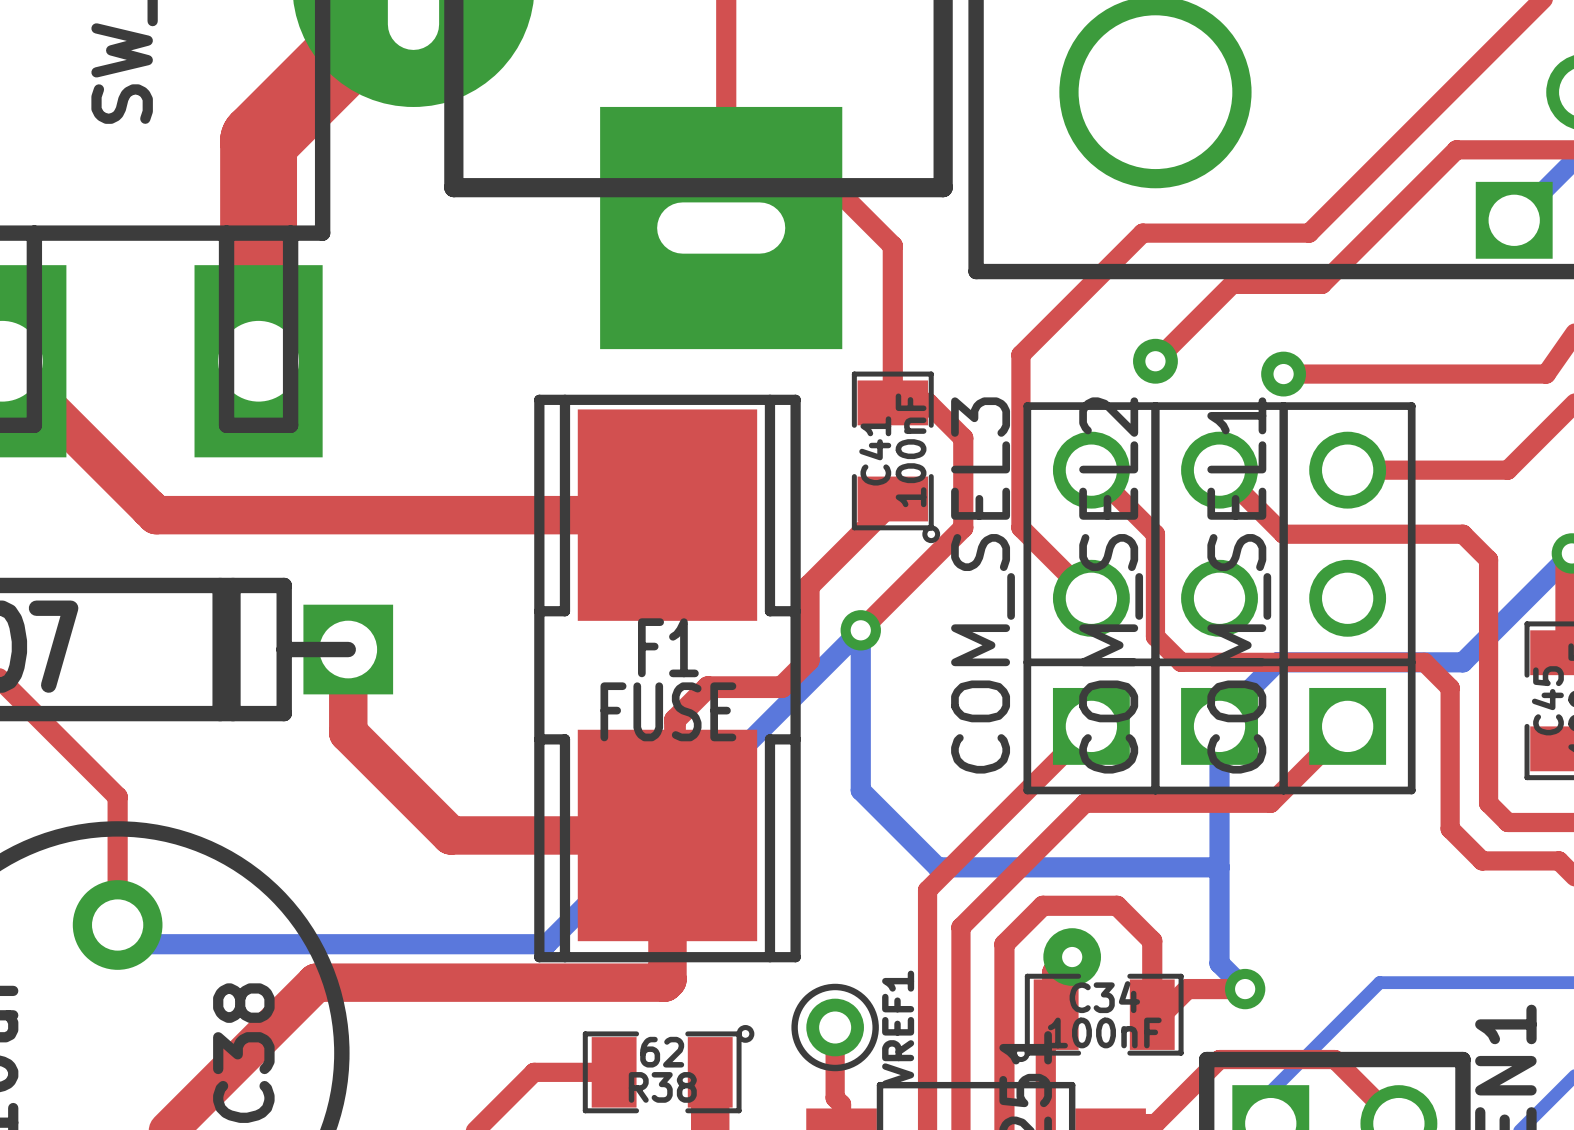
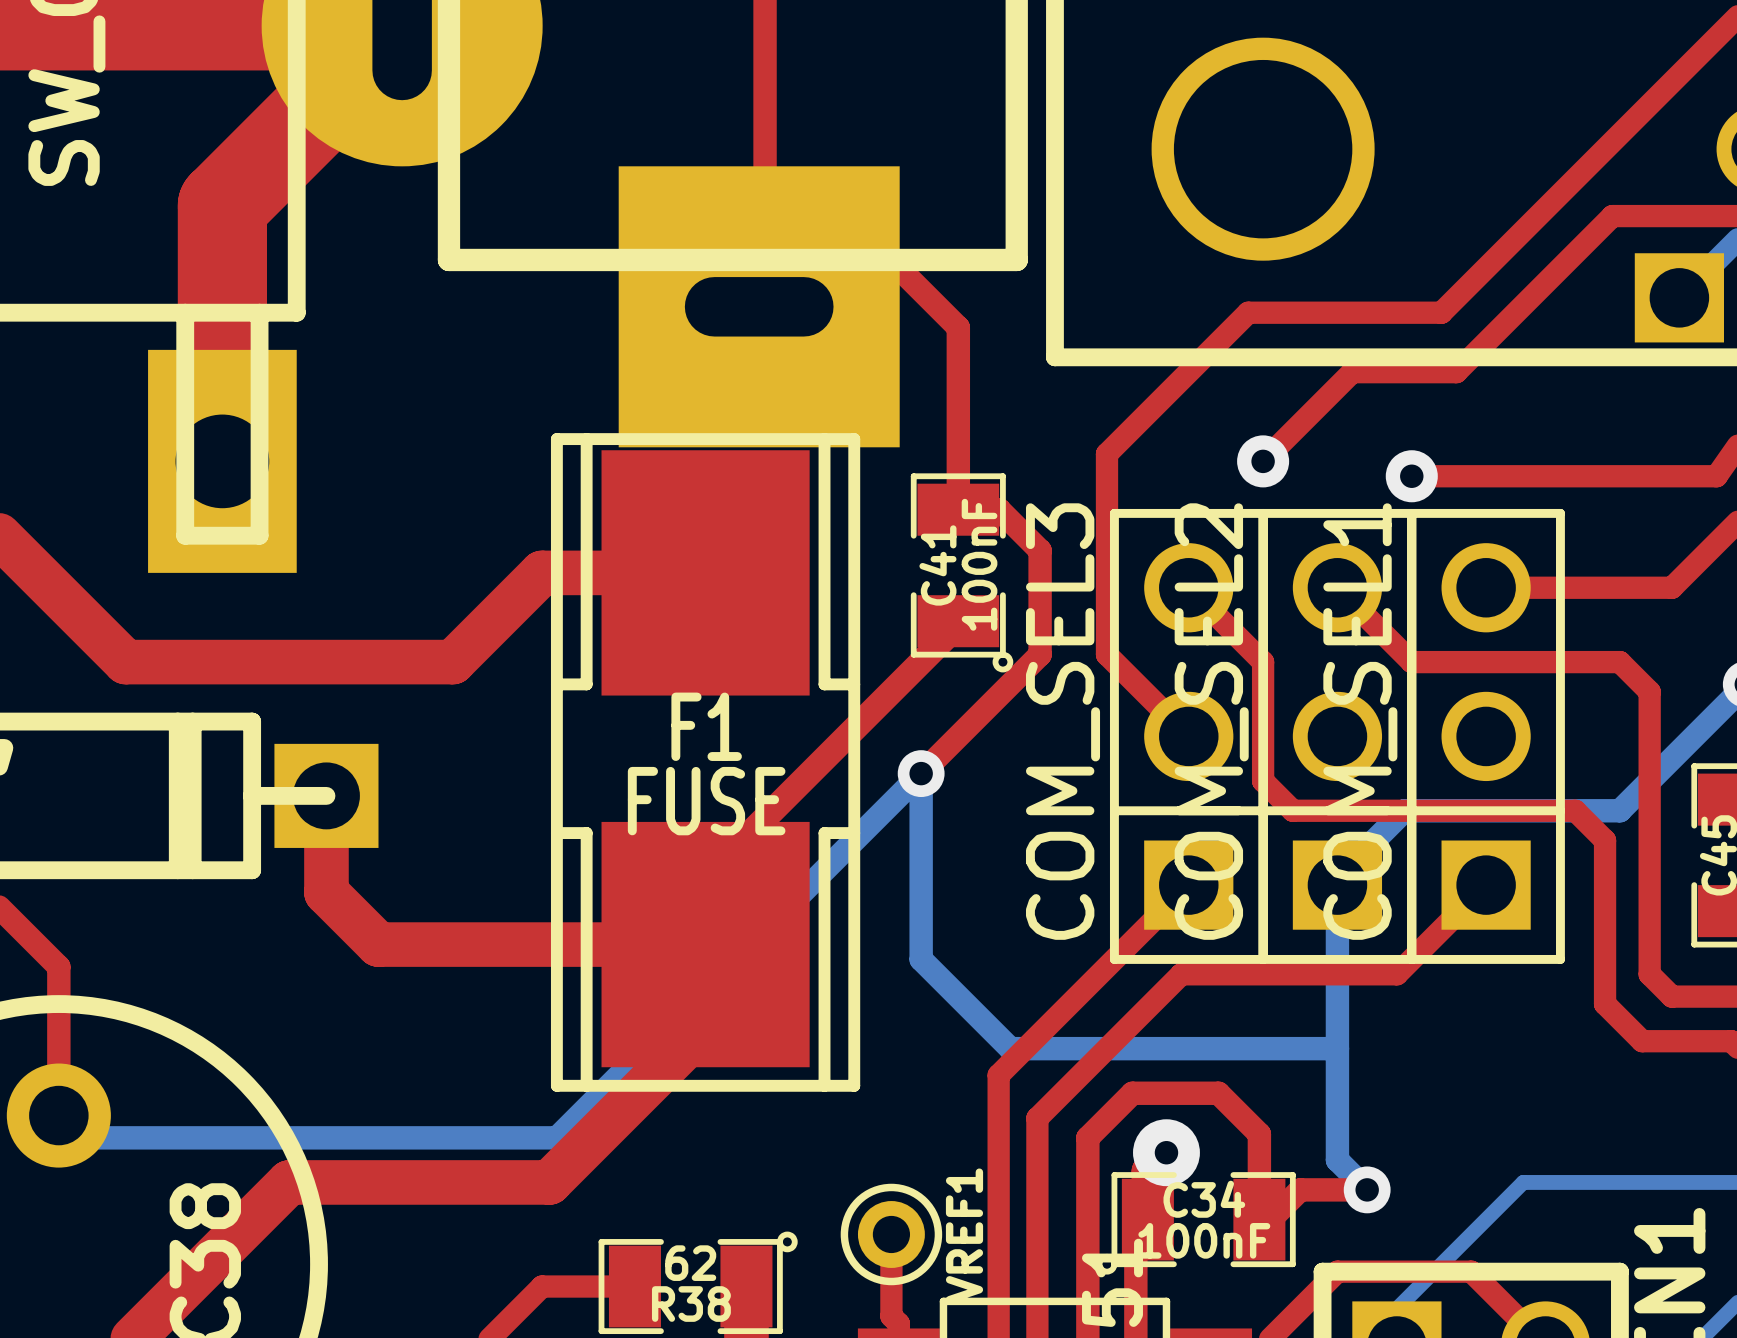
top track: (156, 515) (667, 515) -> (103, 639) (125, 662) (452, 662) (542, 572) (705, 572)
top track: (808, 586) (808, 660) (781, 687) (707, 687) -> (860, 722) (743, 839)
F1 position: (667, 678) -> (705, 762)
top track: (393, 777) (450, 835) (667, 835) -> (378, 944) (705, 944)
top track: (667, 835) (667, 979) (664, 982) (540, 982) -> (705, 1002) (705, 1026) (549, 1182)

